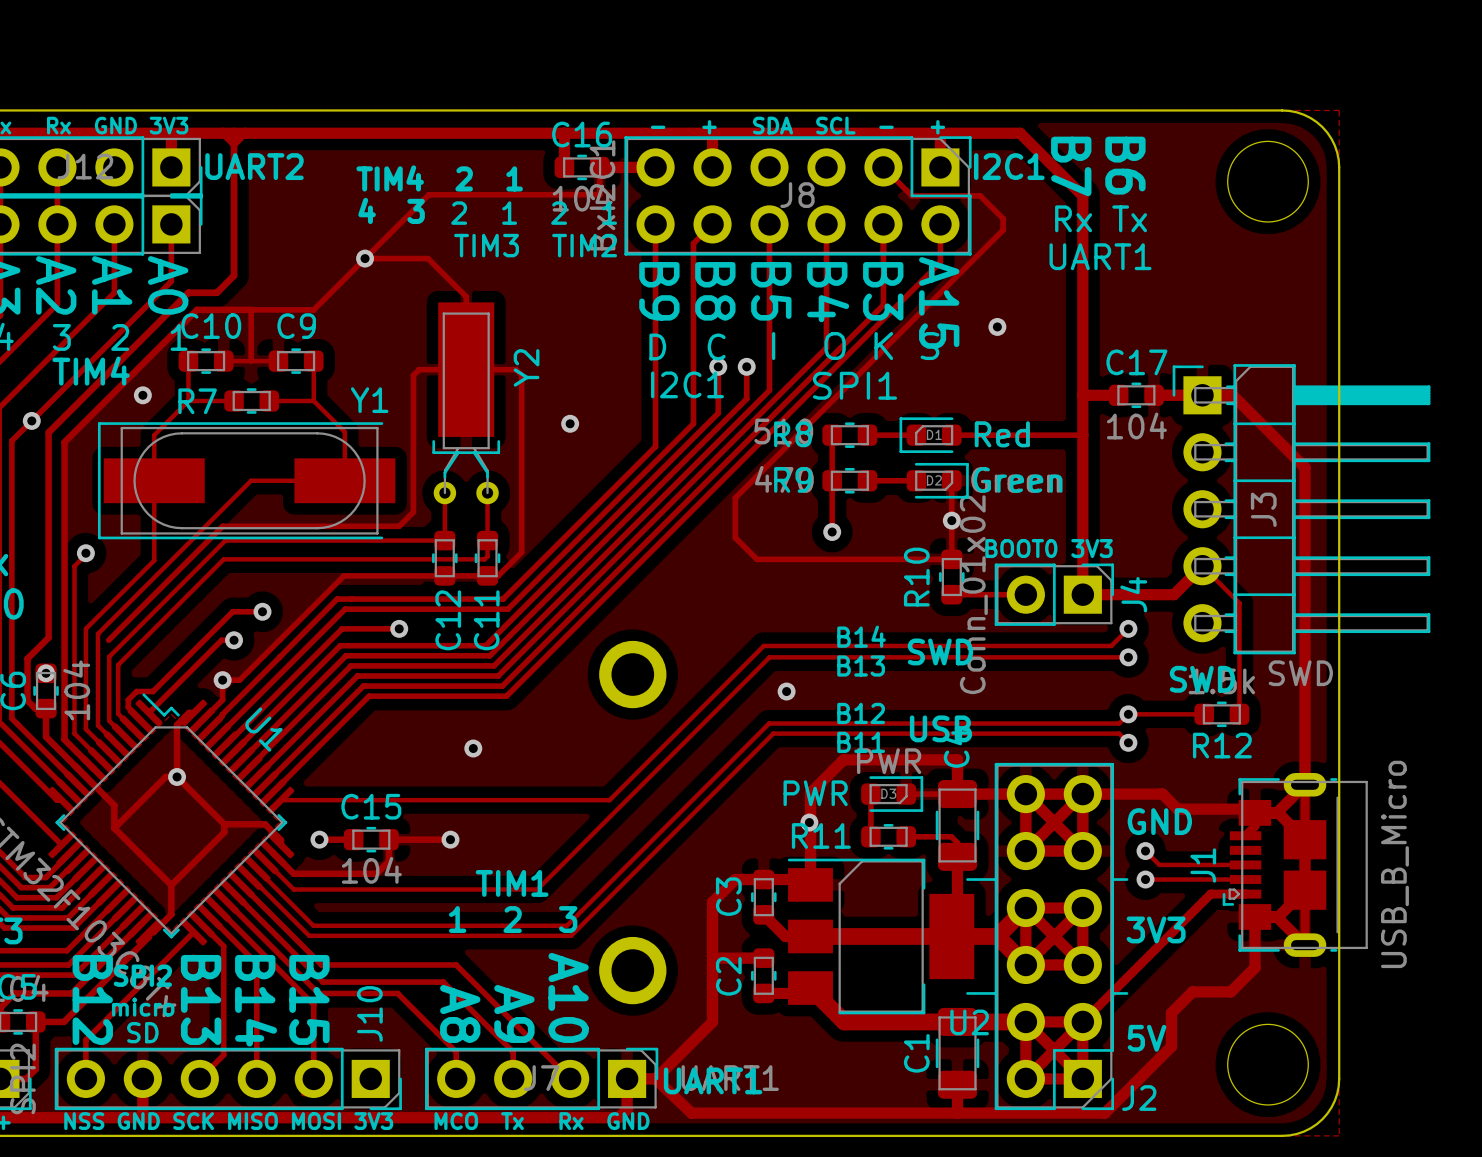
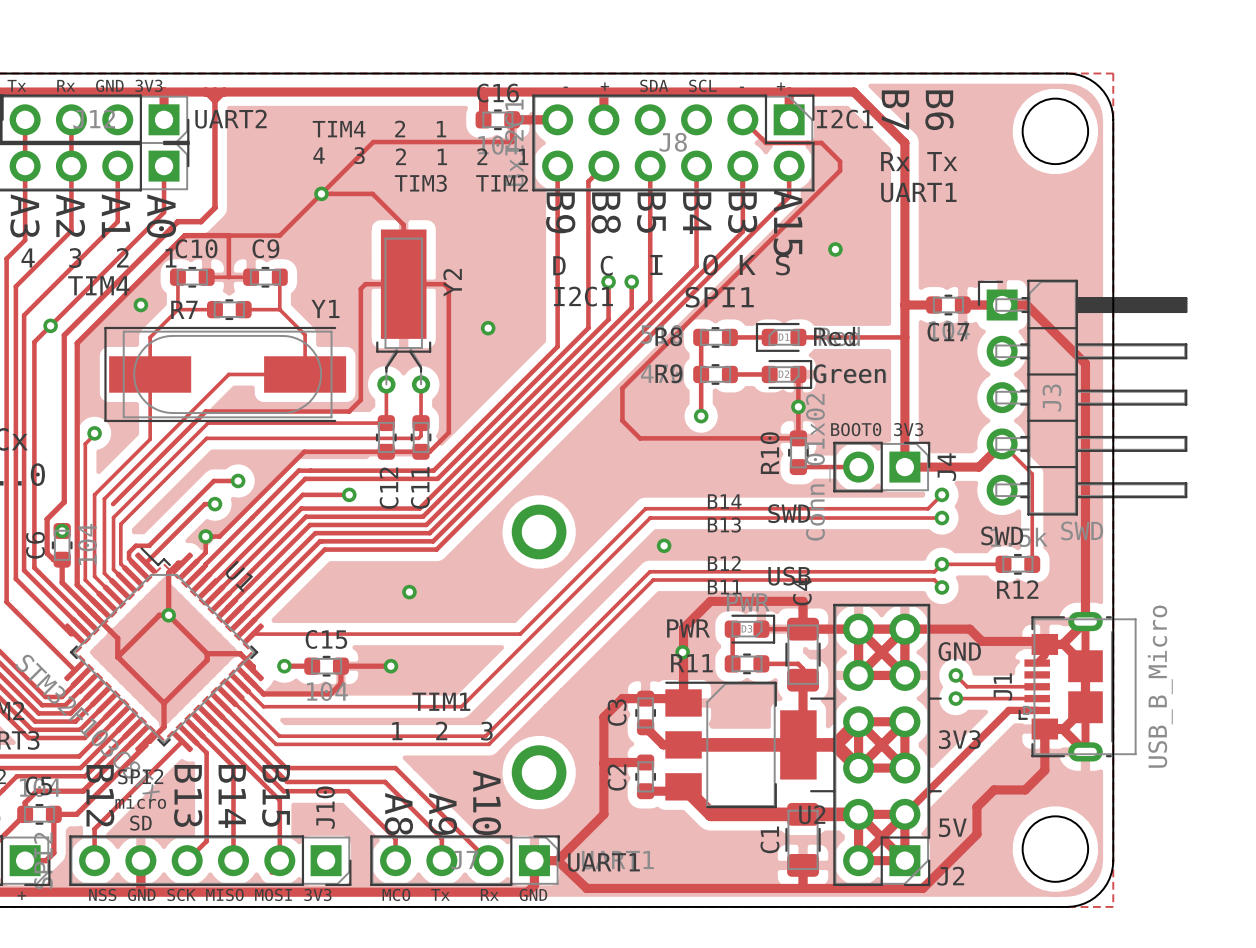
C17 name position: C17 (1136, 362) -> C17 (948, 332)

